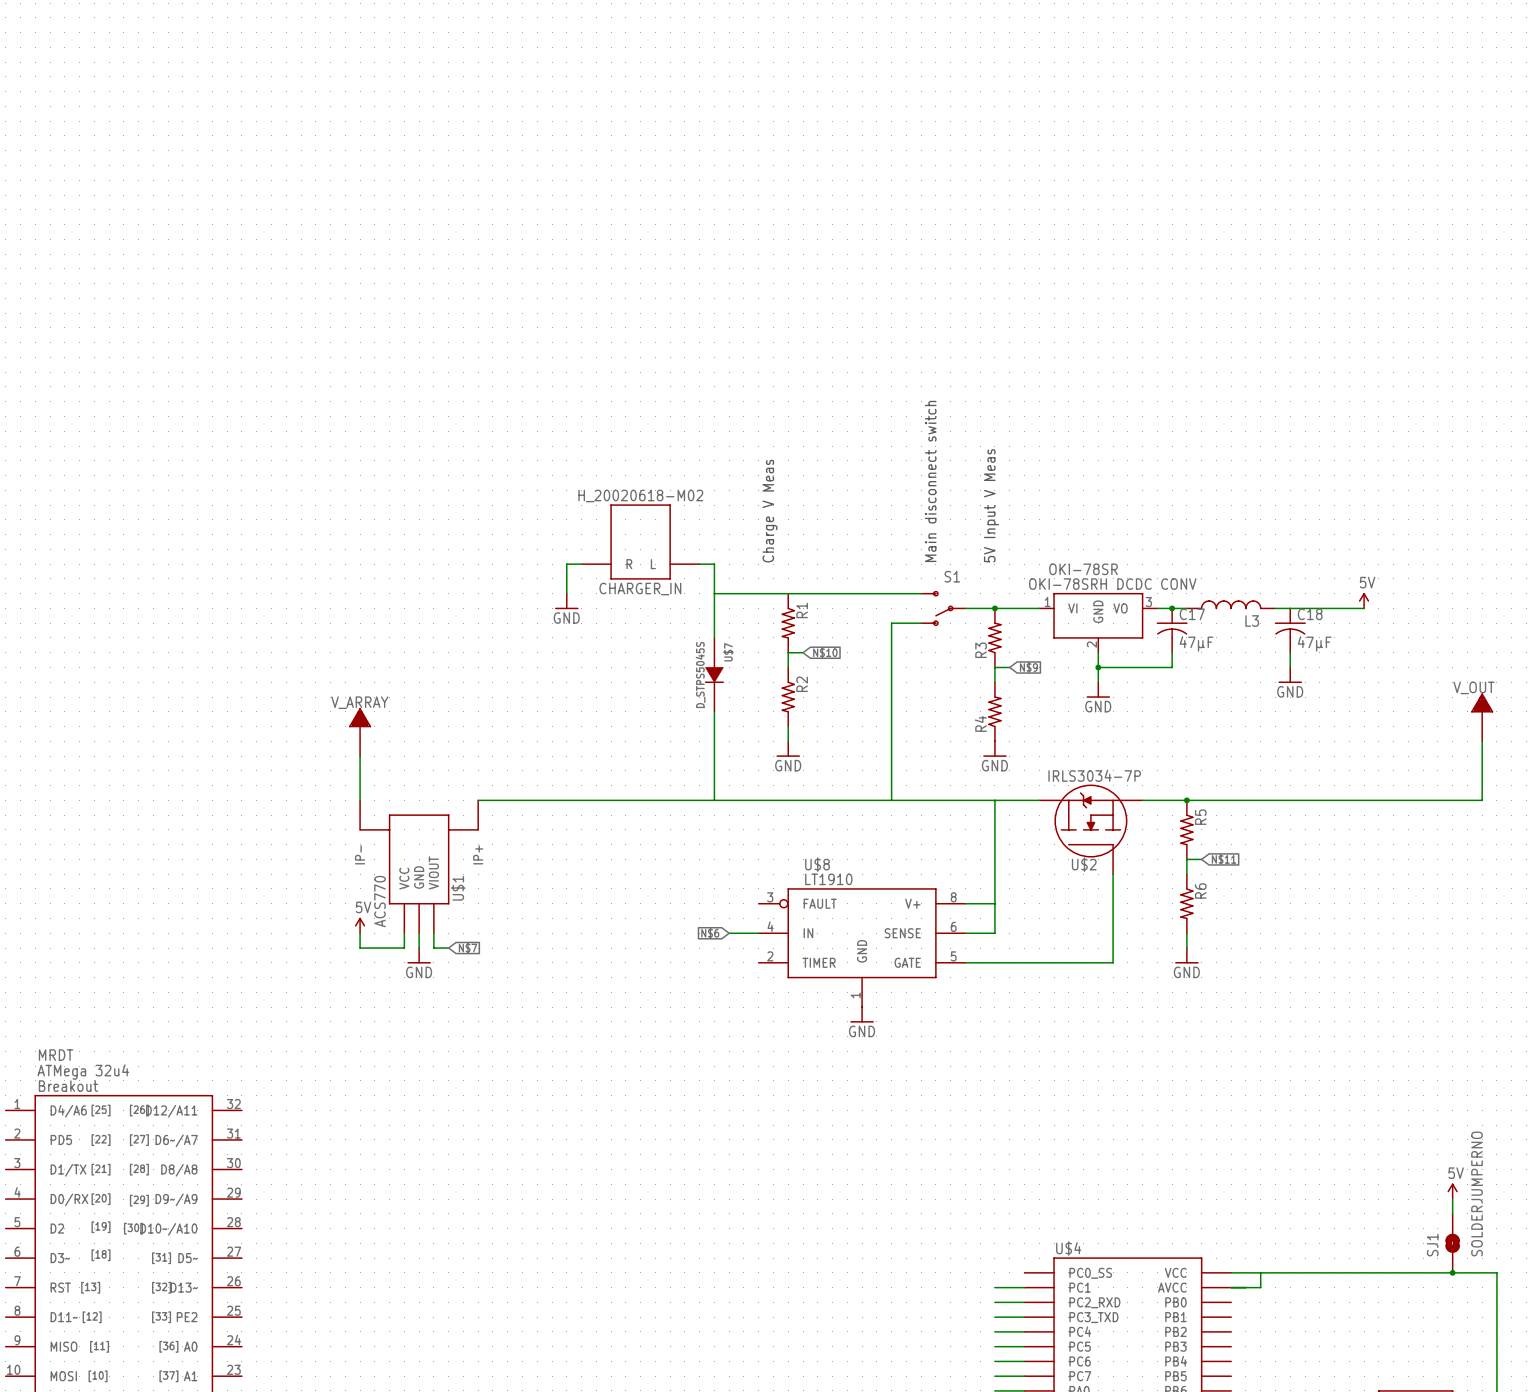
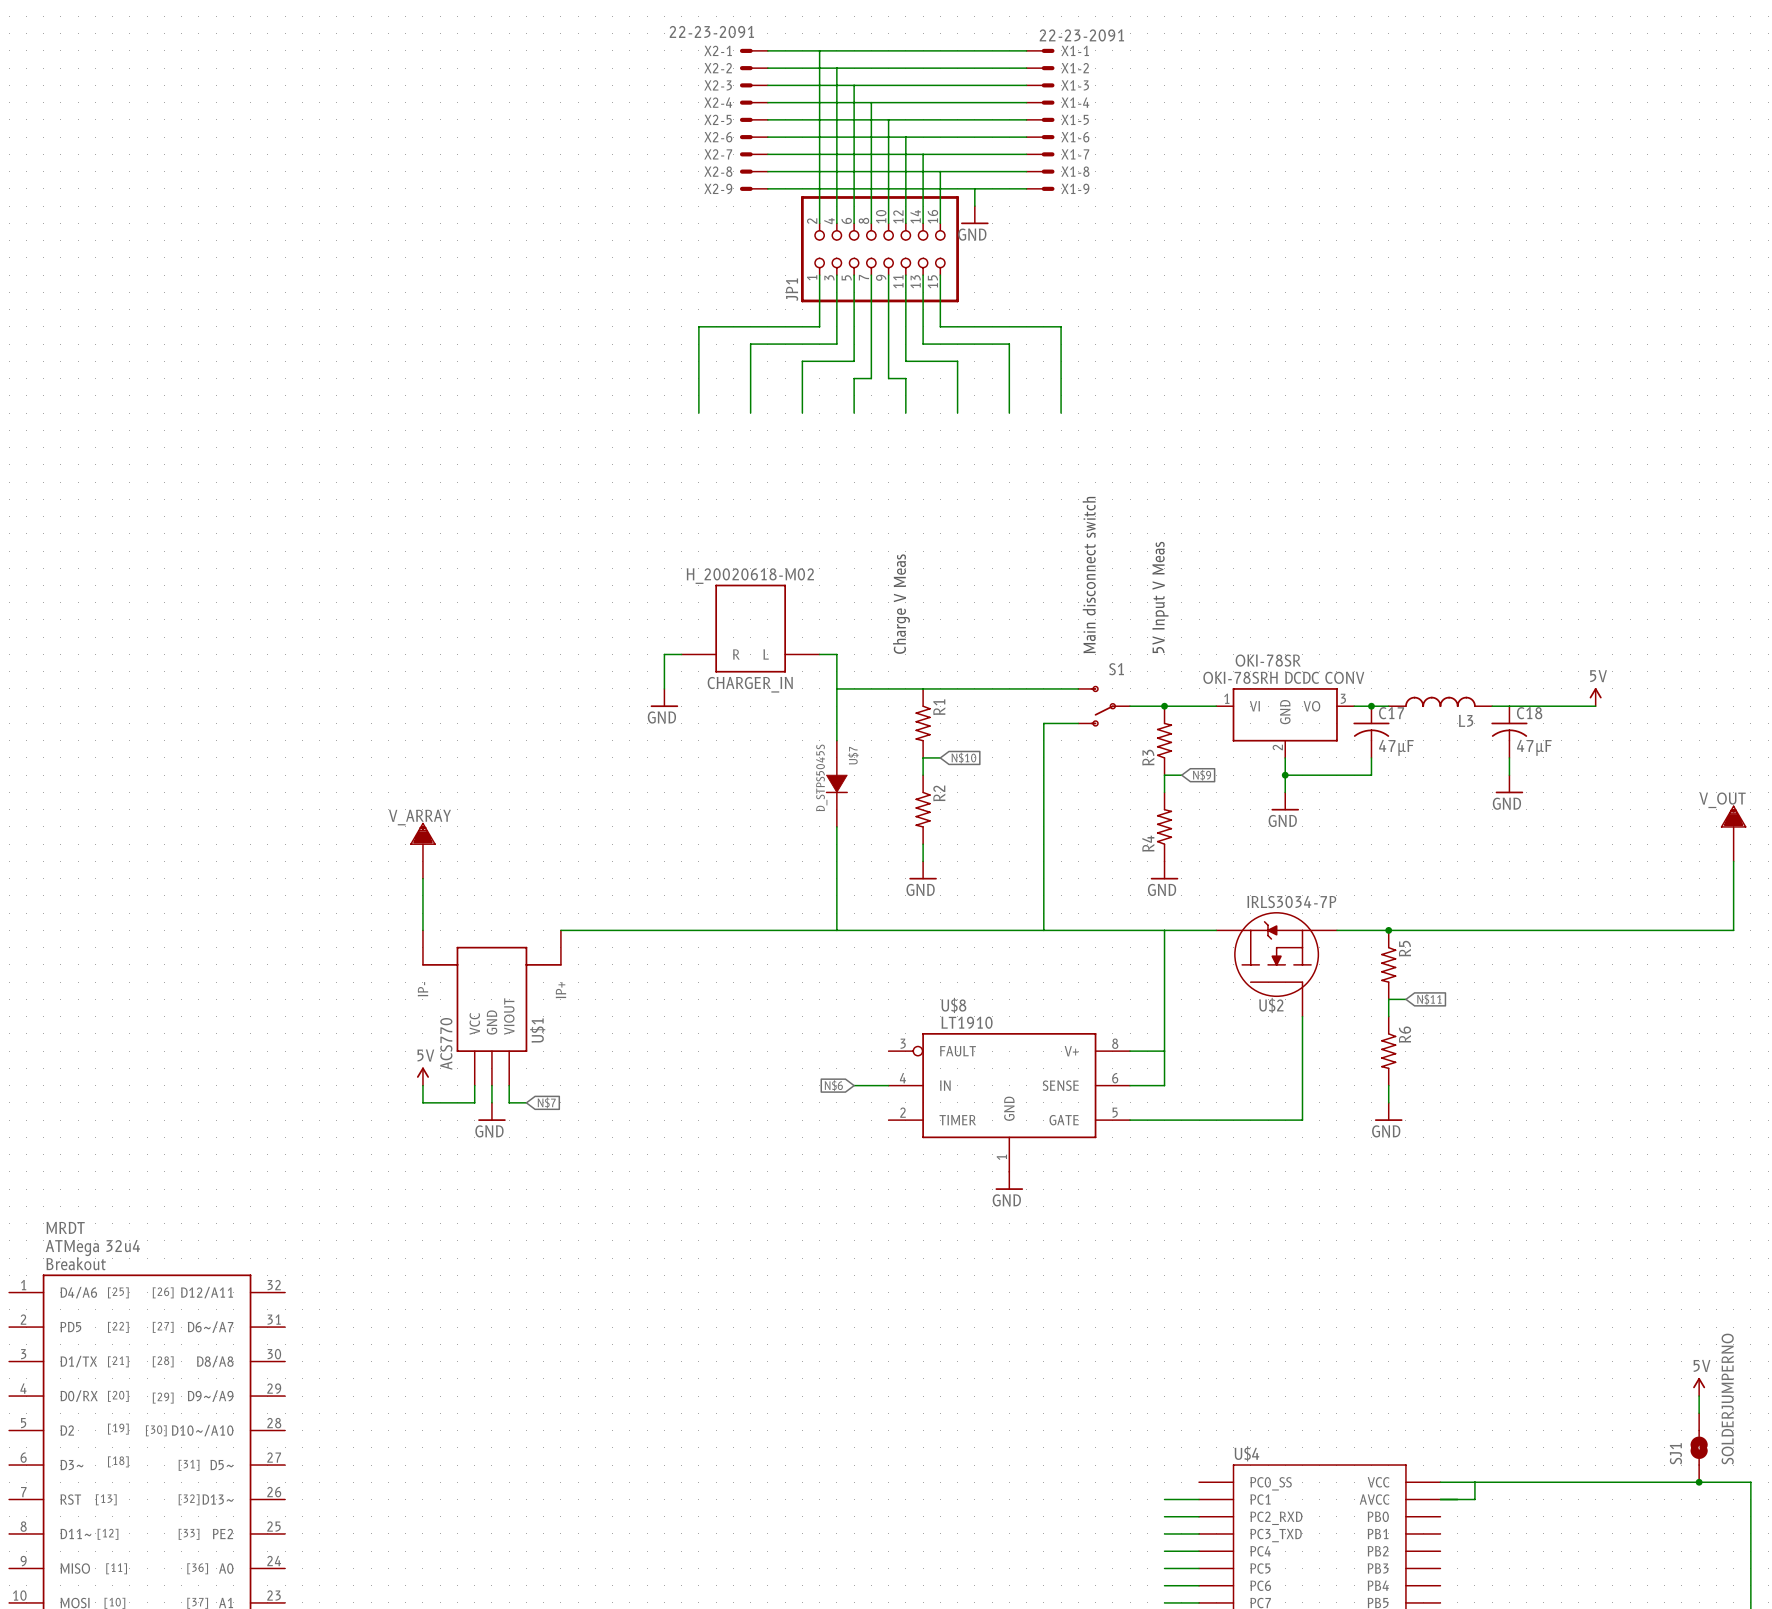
X2-1: none -> 22-23-2091 (753, 50)
wire: none -> (767, 50) (1026, 50)
wire: none -> (819, 50) (819, 223)
X1-1: none -> 22-23-2091 (1040, 50)
X2-2: none -> (753, 68)
wire: none -> (767, 68) (1026, 68)
wire: none -> (836, 68) (836, 223)
X1-2: none -> (1040, 68)
X2-3: none -> (753, 85)
wire: none -> (767, 85) (1026, 85)
wire: none -> (854, 85) (854, 223)
X1-3: none -> (1040, 85)
X2-4: none -> (753, 102)
wire: none -> (767, 102) (1026, 102)
wire: none -> (871, 102) (871, 223)
X1-4: none -> (1040, 102)
X2-5: none -> (753, 119)
wire: none -> (767, 119) (1026, 119)
wire: none -> (888, 119) (888, 223)
X1-5: none -> (1040, 119)
X2-6: none -> (753, 137)
wire: none -> (767, 137) (1026, 137)
wire: none -> (905, 137) (905, 223)
X1-6: none -> (1040, 137)
X2-7: none -> (753, 154)
wire: none -> (767, 154) (1026, 154)
wire: none -> (923, 154) (923, 223)
X1-7: none -> (1040, 154)
X2-8: none -> (753, 171)
wire: none -> (767, 171) (1026, 171)
wire: none -> (940, 171) (940, 223)
X1-8: none -> (1040, 171)
X2-9: none -> (753, 188)
wire: none -> (767, 188) (1026, 188)
wire: none -> (974, 188) (974, 206)
X1-9: none -> (1040, 188)
power symbol: none -> GND (974, 215)
JP1: none -> (879, 249)
wire: none -> (819, 275) (819, 326) (698, 326) (698, 413)
wire: none -> (836, 275) (836, 344) (750, 344) (750, 413)
wire: none -> (854, 275) (854, 361) (802, 361) (802, 413)
wire: none -> (871, 275) (871, 378) (854, 378) (854, 413)
wire: none -> (888, 275) (888, 378) (905, 378) (905, 413)
wire: none -> (905, 275) (905, 361) (957, 361) (957, 413)
wire: none -> (923, 275) (923, 344) (1009, 344) (1009, 413)
wire: none -> (940, 275) (940, 326) (1061, 326) (1061, 413)

